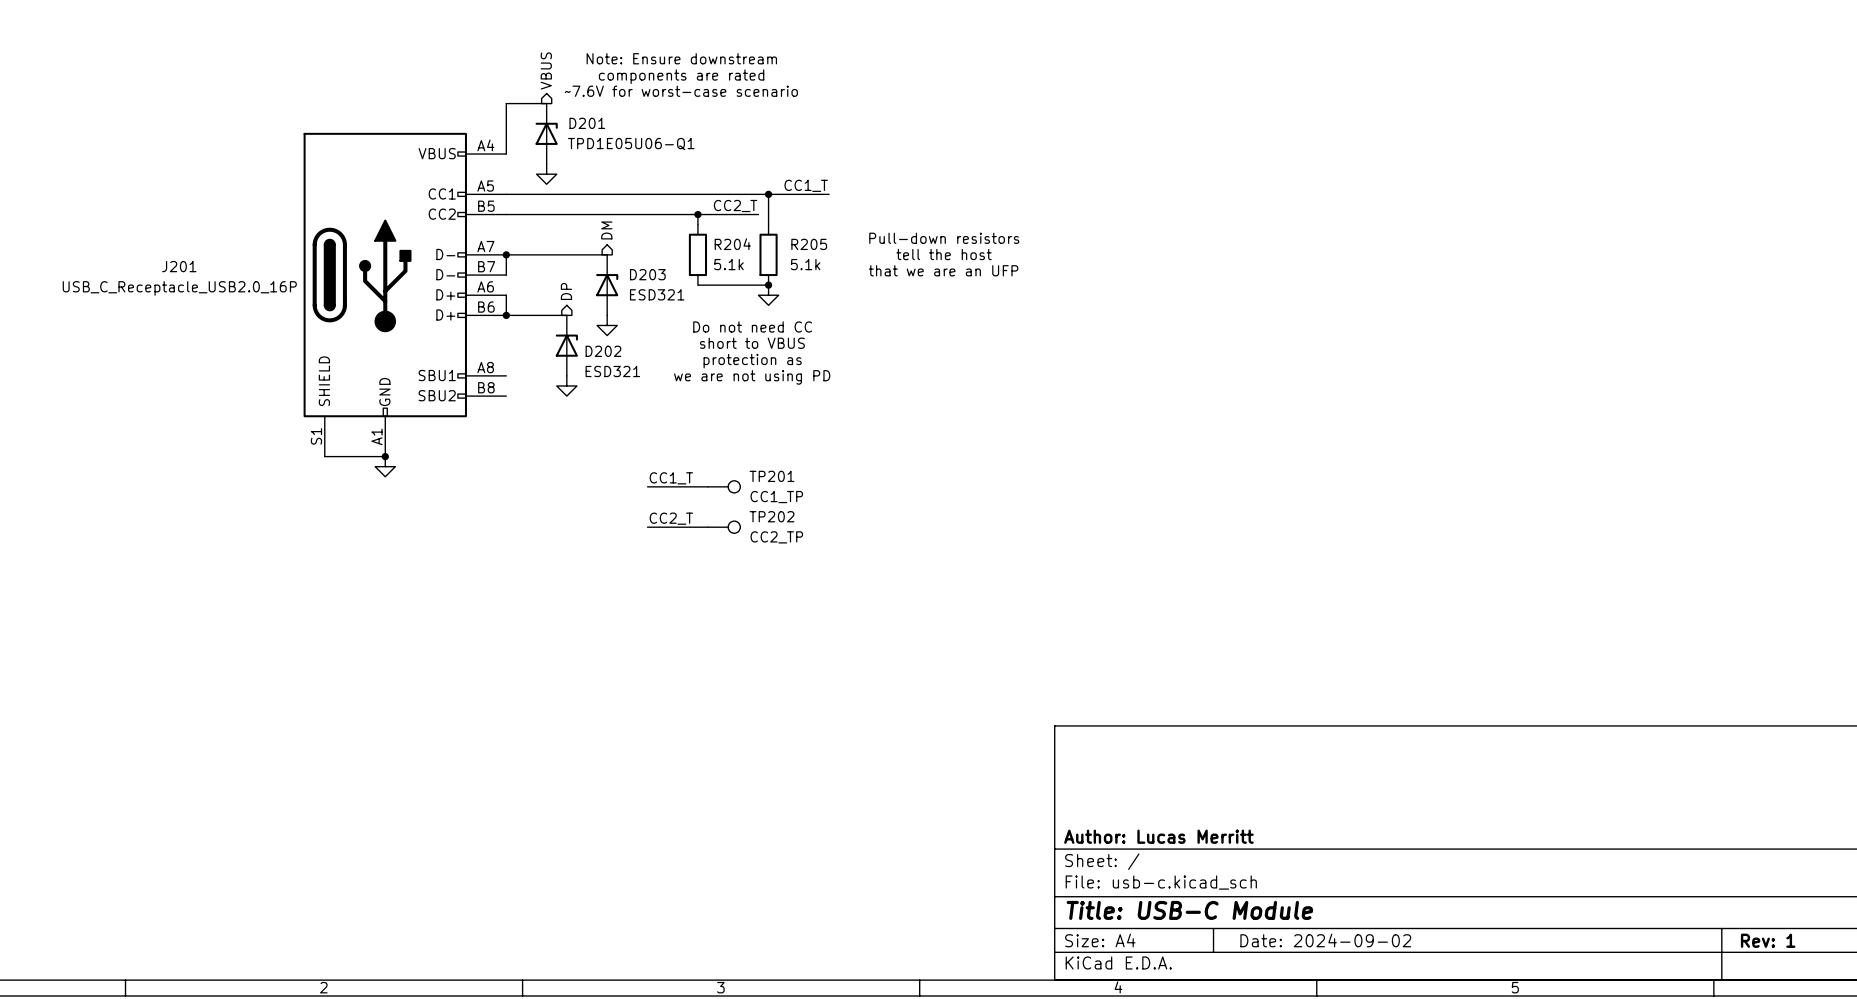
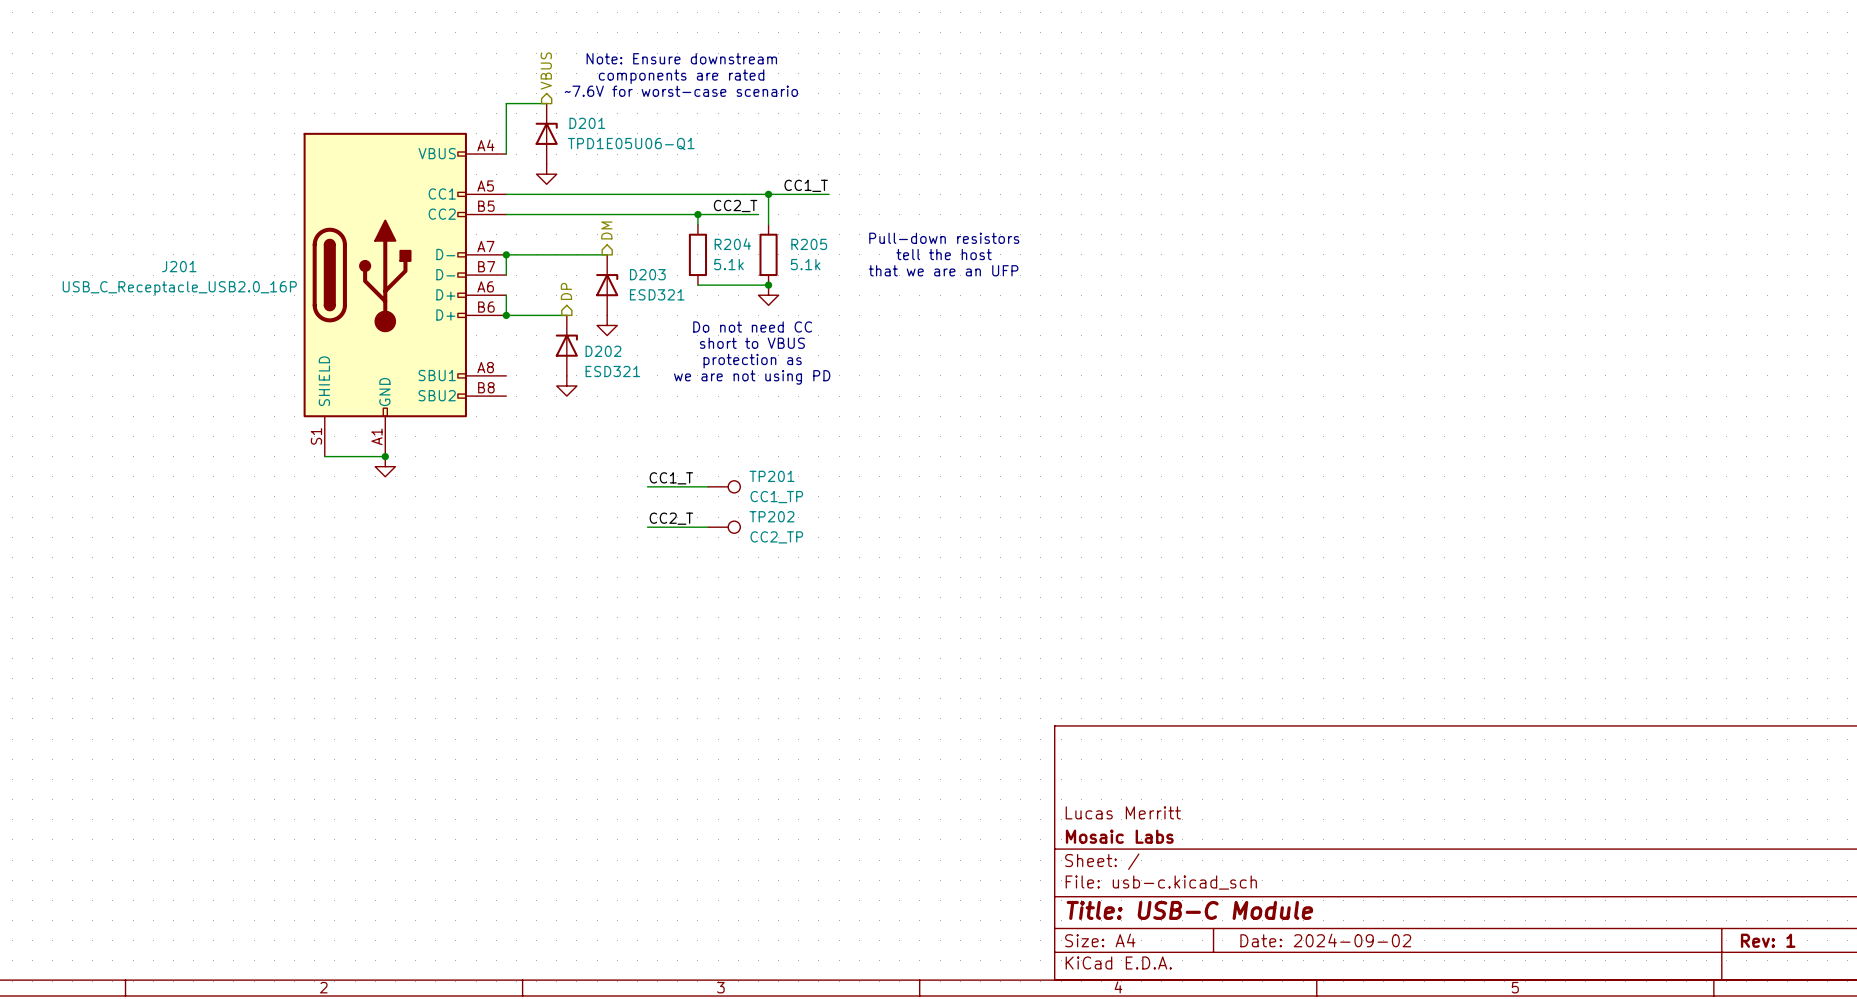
title block: none -> Lucas Merritt (1123, 812)
title block: Author: Lucas Merritt (1158, 836) -> Mosaic Labs (1119, 836)

